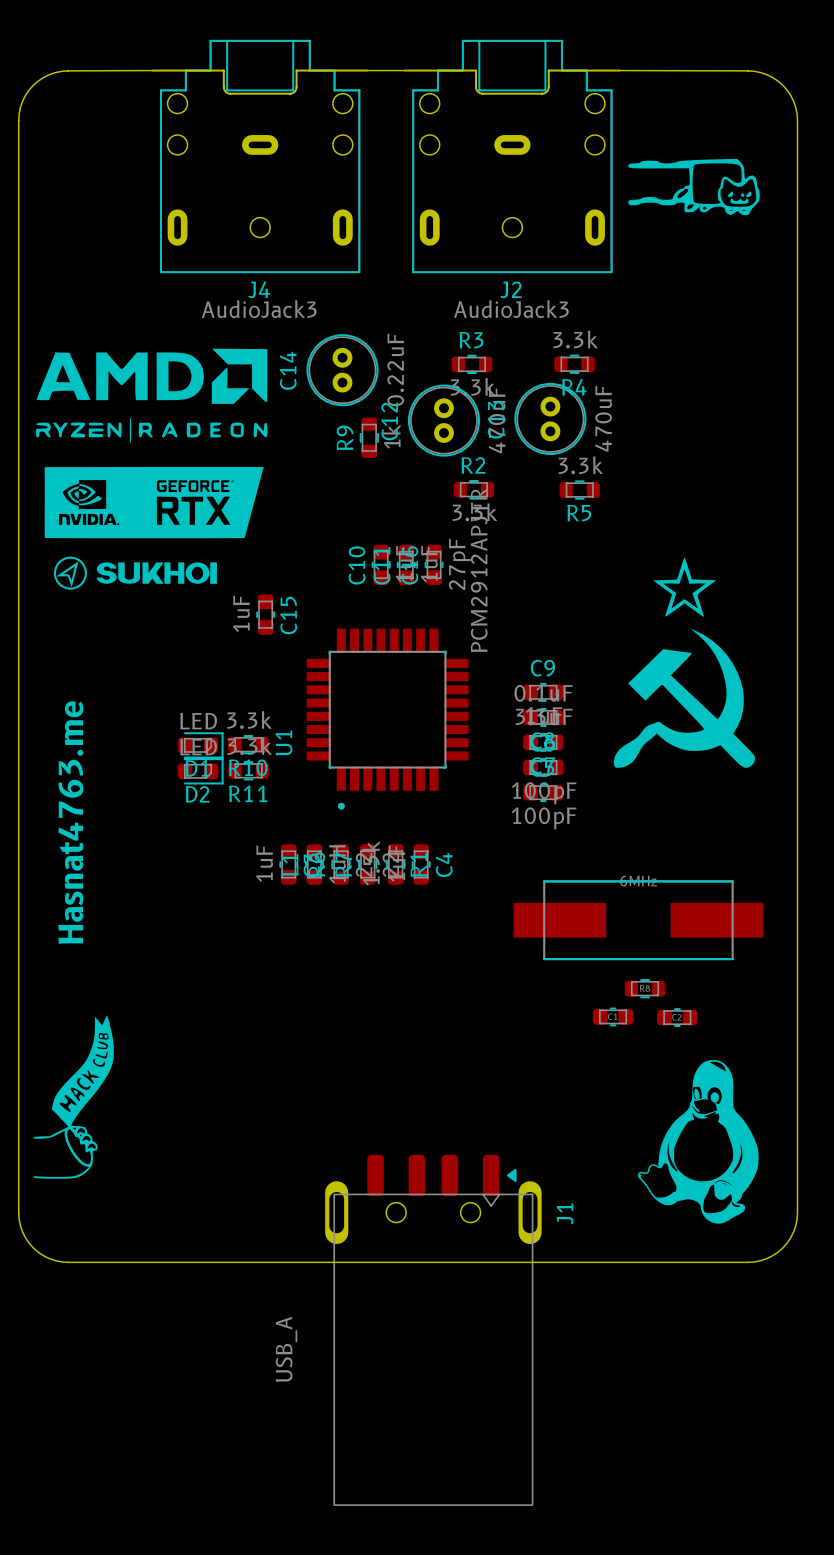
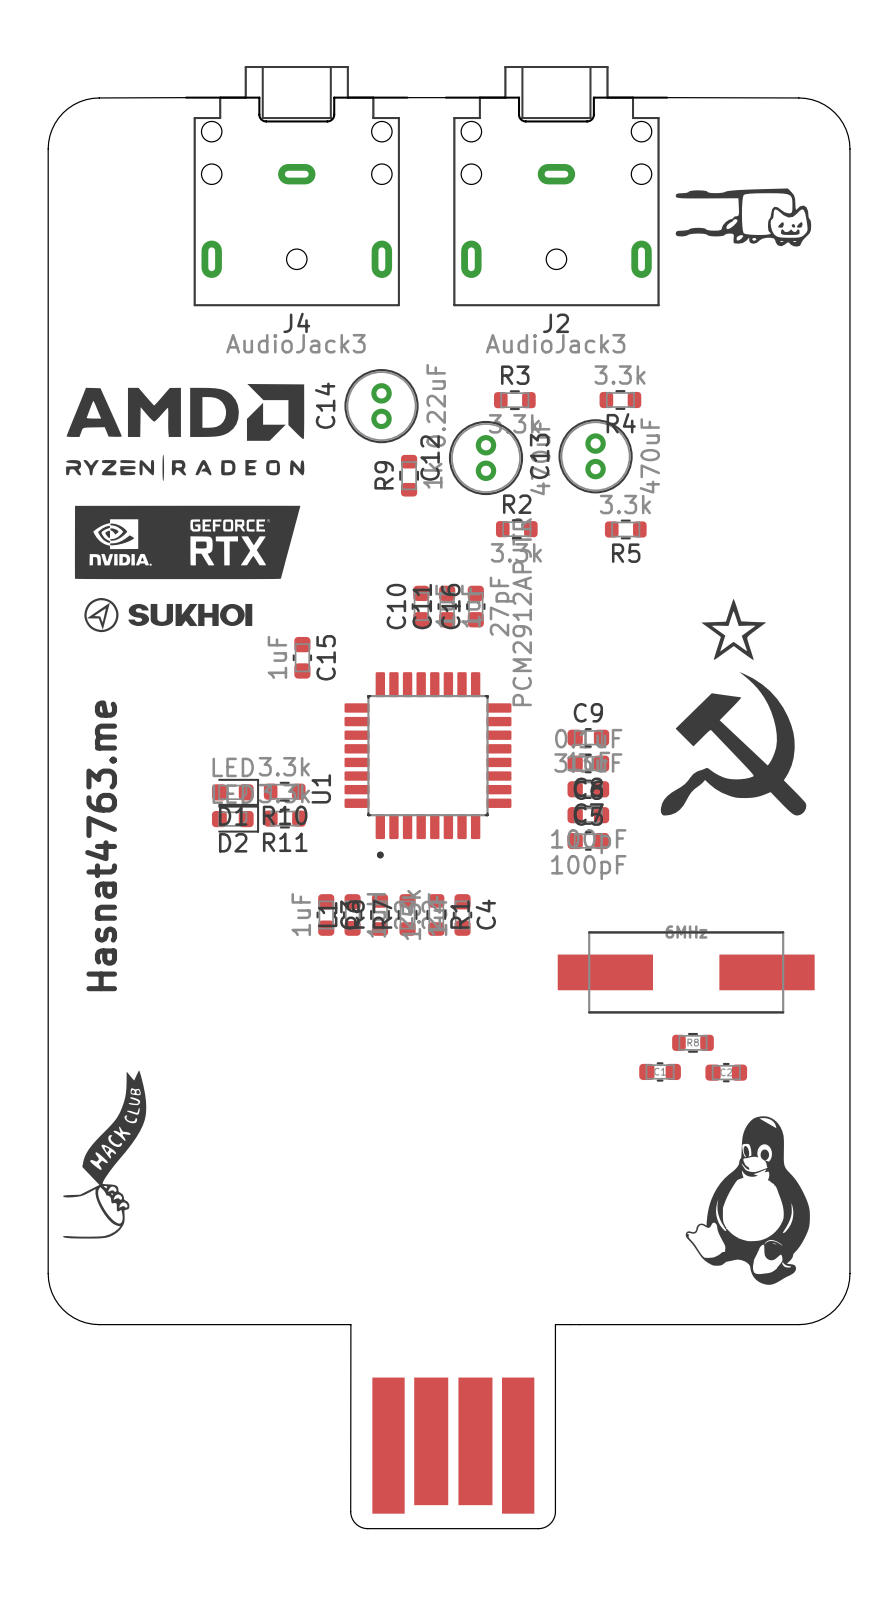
board edge: (312, 1262) (511, 1262) -> (350, 1324) (350, 1513) (357, 1525) (367, 1528) (538, 1528) (550, 1523) (555, 1511) (555, 1324)
J1: USB_A (433, 1330) -> none
part: none -> (453, 1445)

